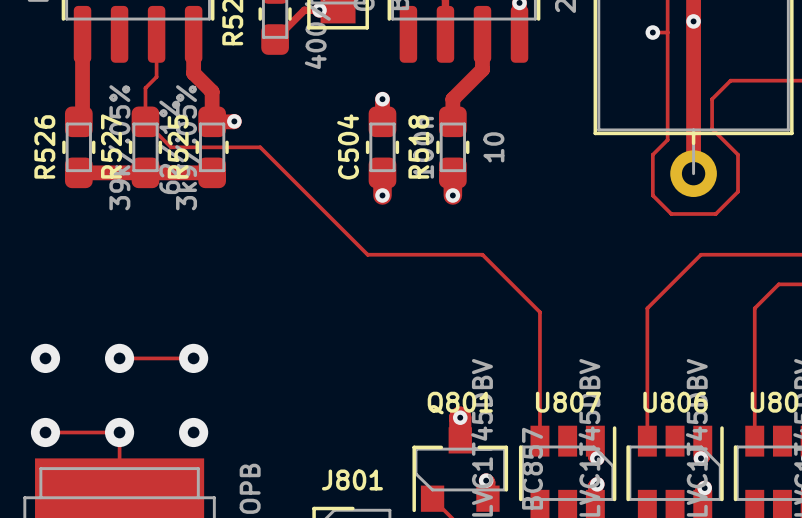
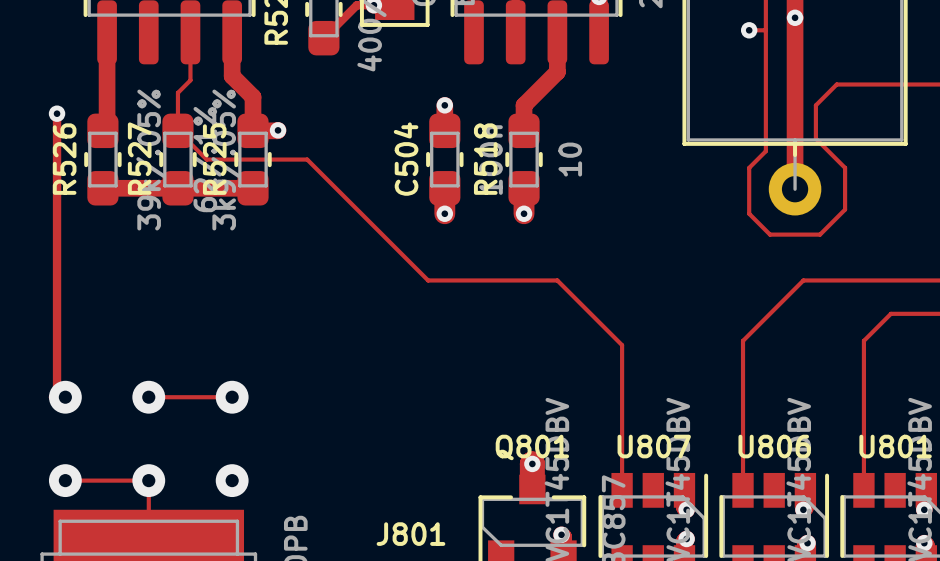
track: none -> (57, 113) (57, 393) (52, 397)
via: none -> (57, 113)

